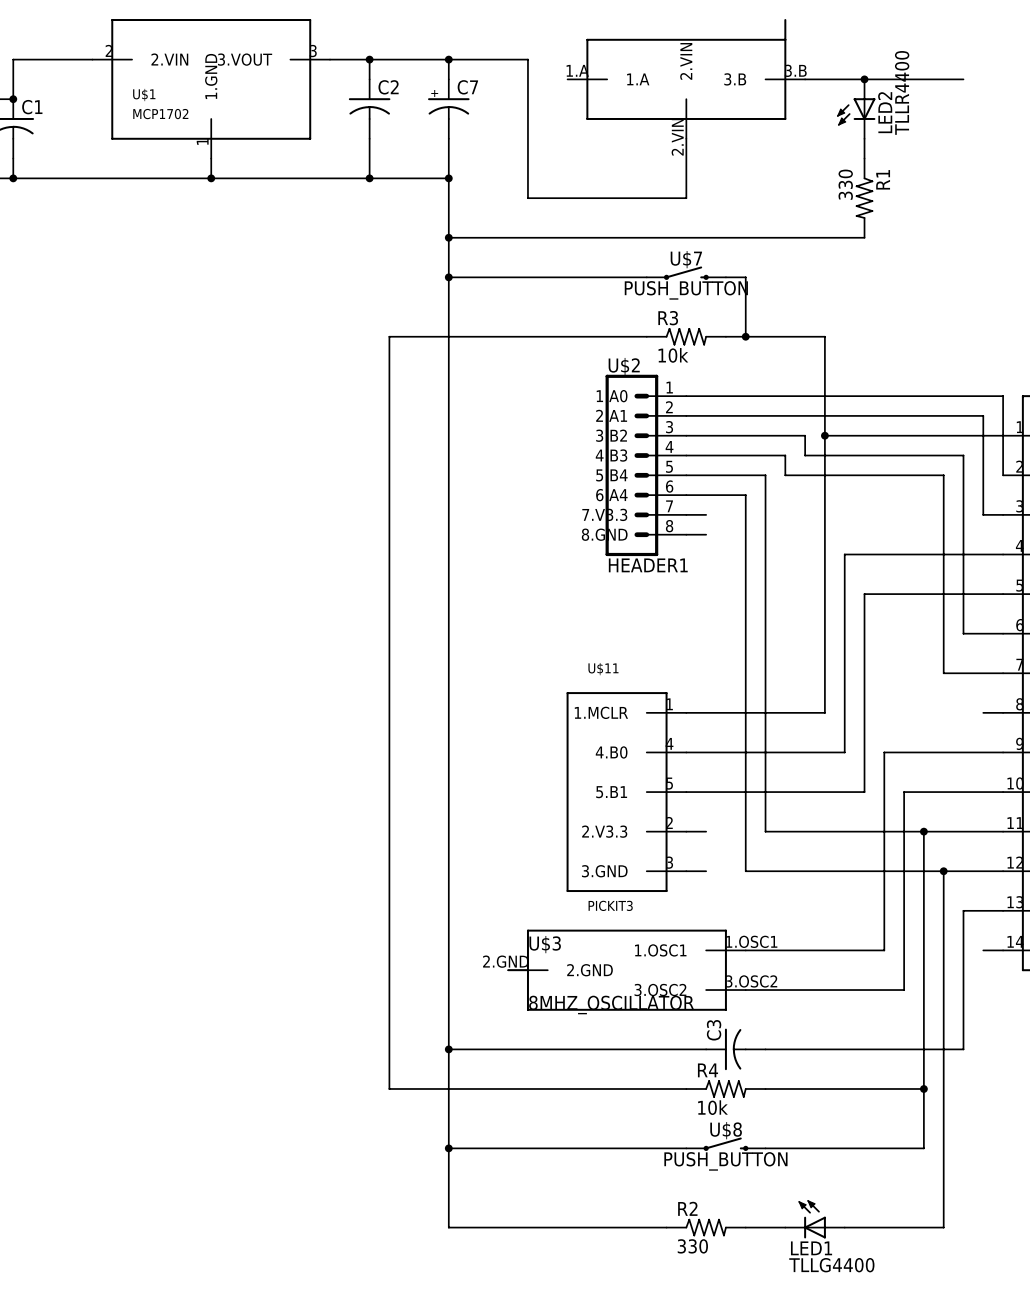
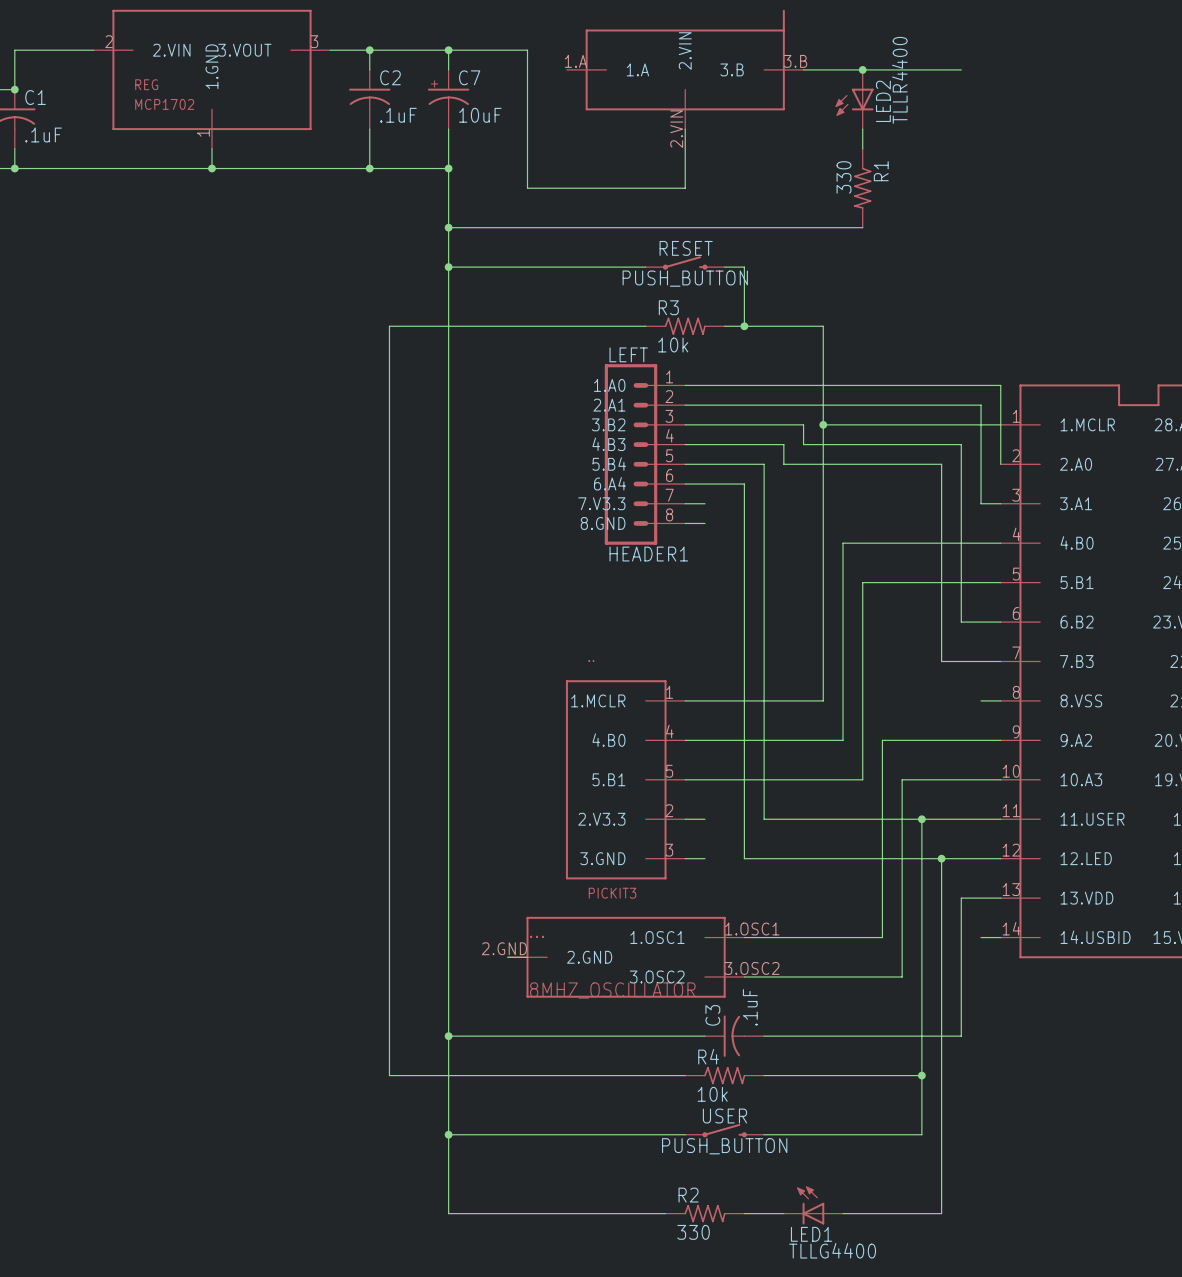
U$1 name: U$1 (144, 95) -> REG (146, 84)
C7 value: none -> 10uF (480, 115)
C2 value: none -> .1uF (398, 115)
C1 value: none -> .1uF (43, 135)
U$7 name: U$7 (686, 259) -> RESET (686, 248)
U$2 name: U$2 (624, 366) -> LEFT (628, 354)
U$11 name: U$11 (603, 669) -> .. (591, 661)
U$3 name: U$3 (545, 944) -> ... (537, 936)
C3 value: none -> .1uF (750, 1007)
U$8 name: U$8 (726, 1130) -> USER (724, 1116)

